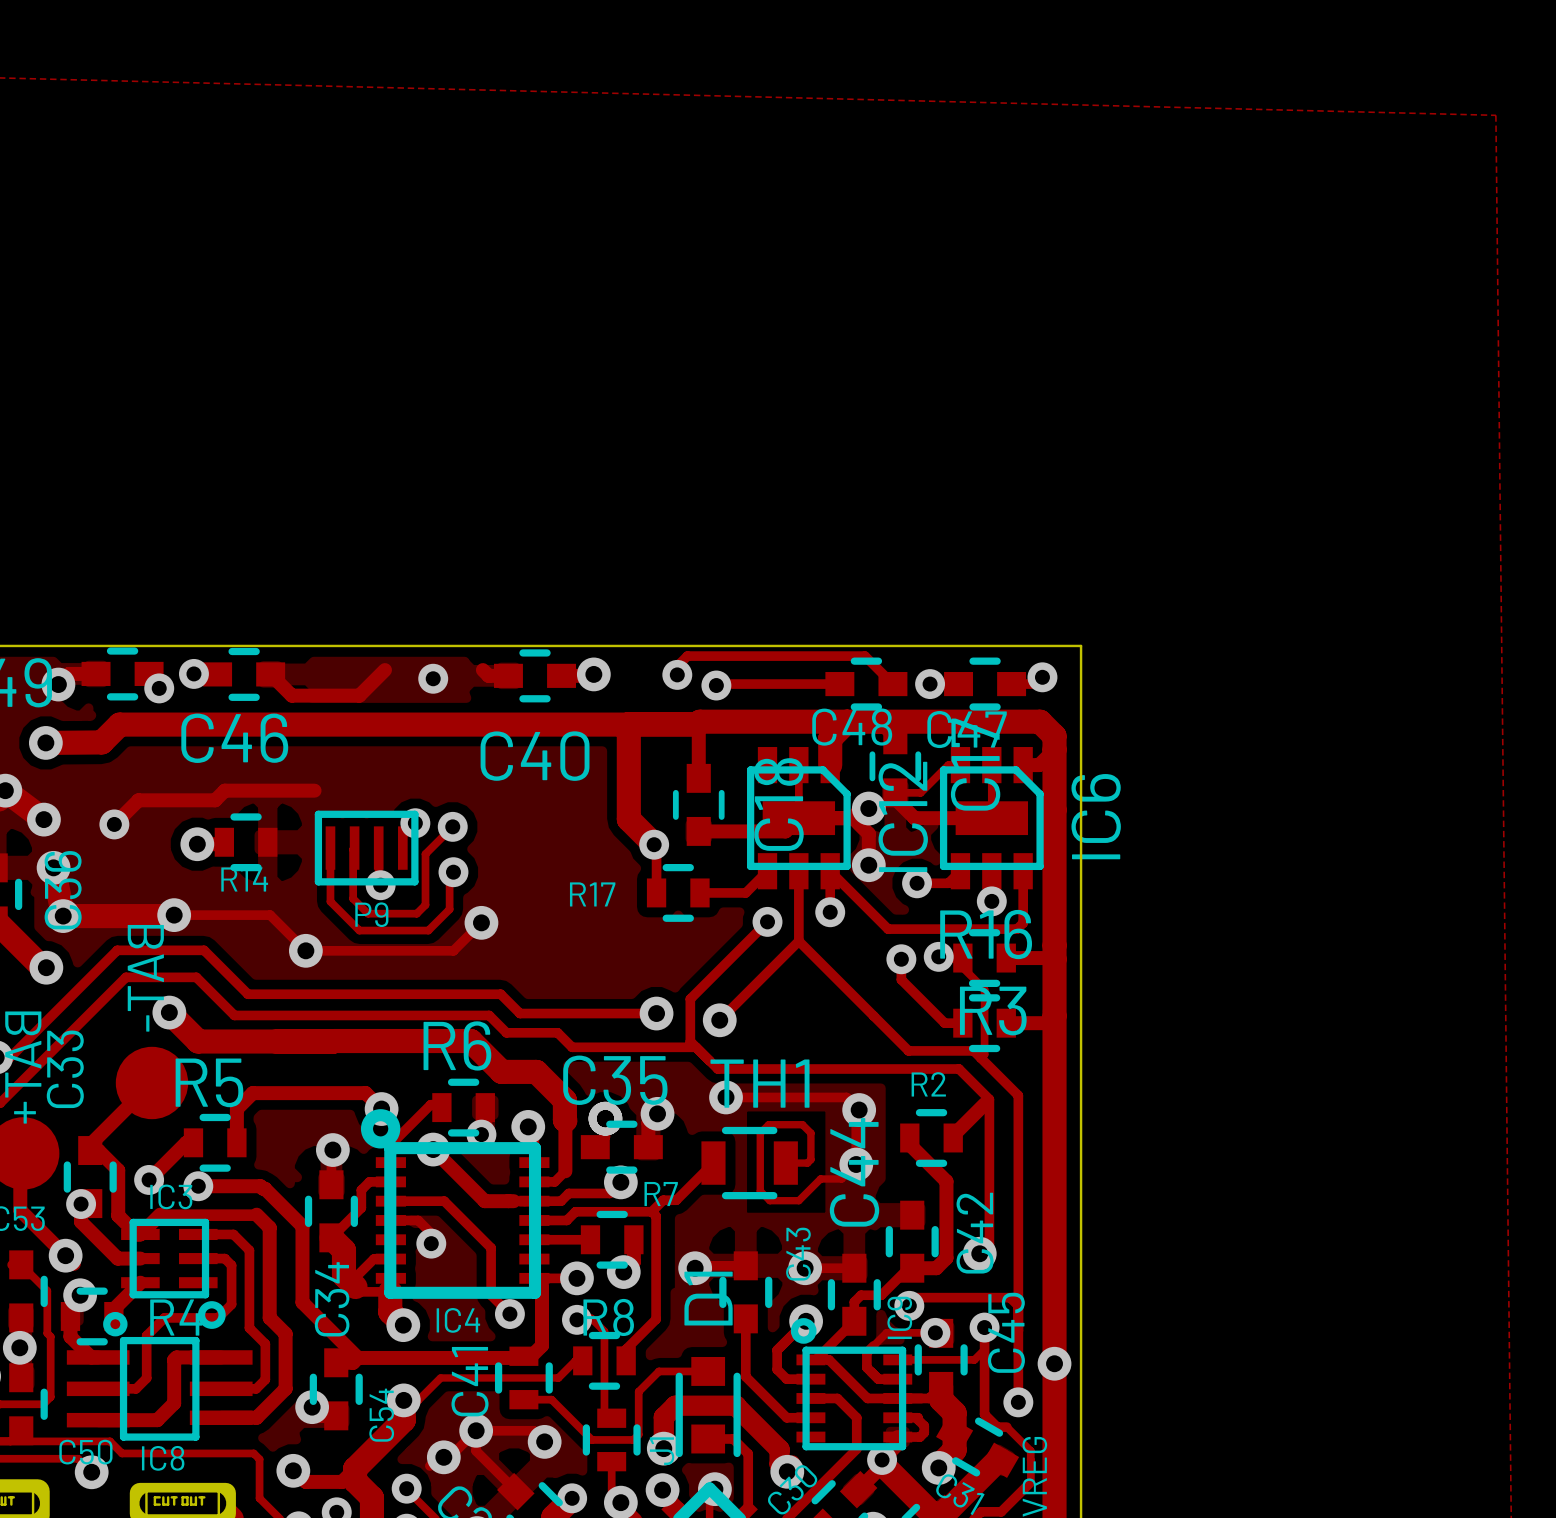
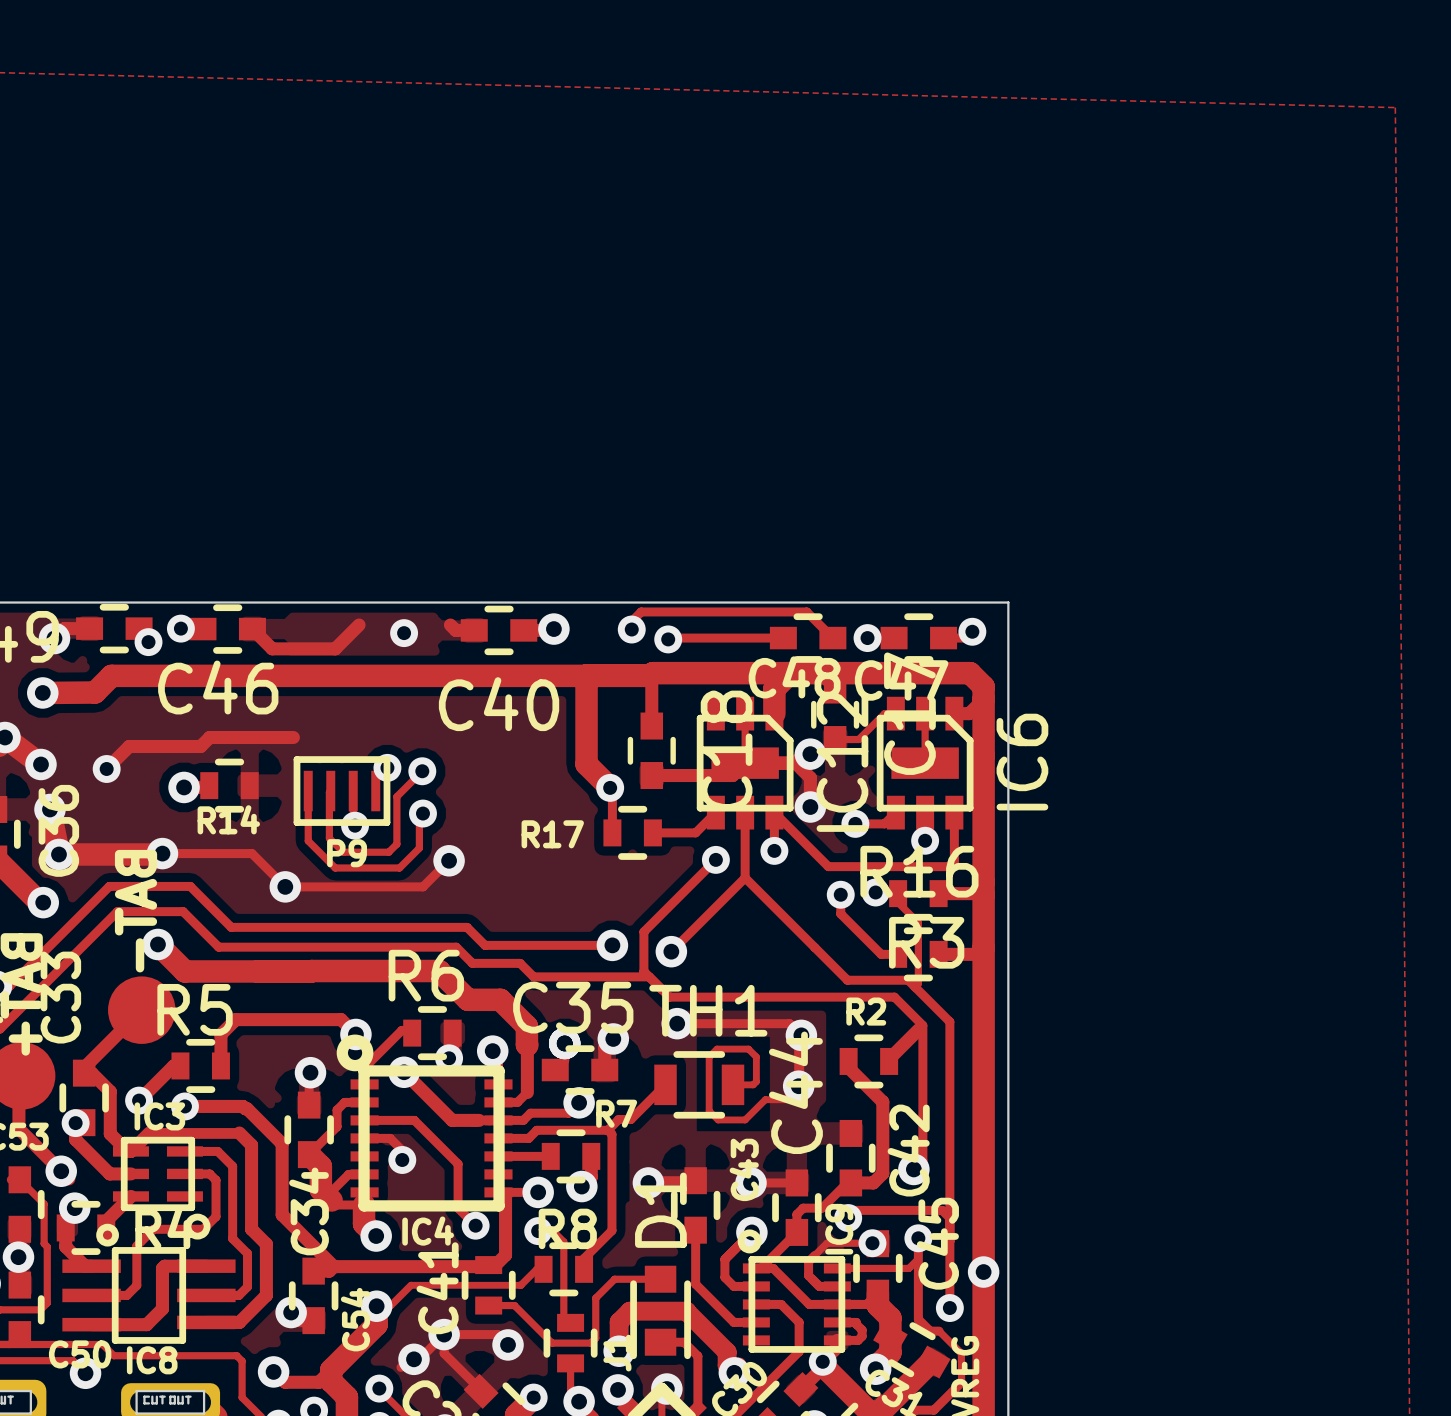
track: (895, 792) (895, 798) (914, 818) (991, 818) -> none

